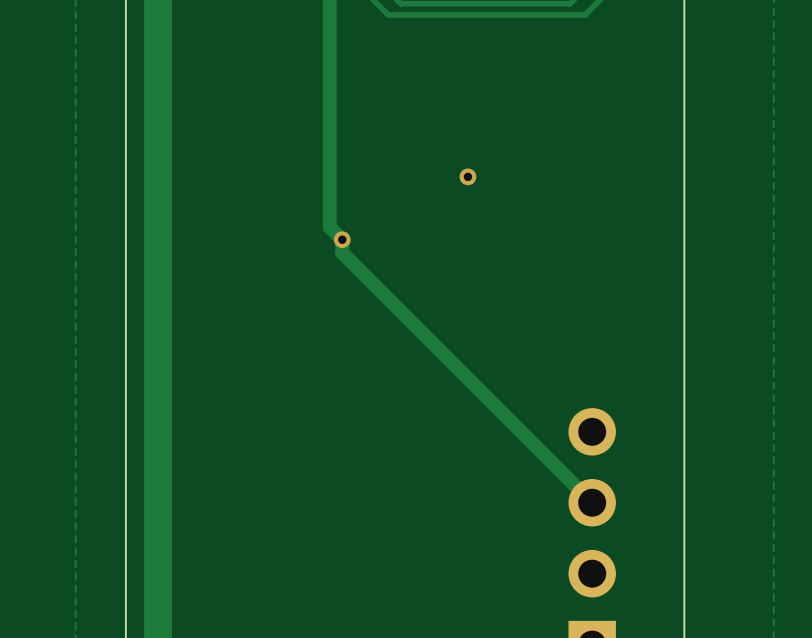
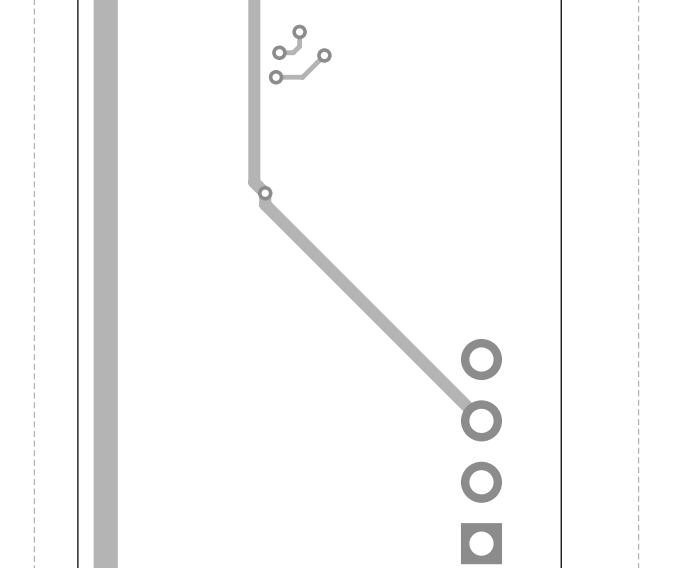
track: none -> (299, 31) (299, 46) (293, 52) (279, 52)
via: none -> (299, 31)
via: none -> (279, 52)
track: none -> (324, 55) (302, 77) (276, 77)
via: none -> (324, 55)
via: none -> (276, 77)
via: (467, 176) -> none

